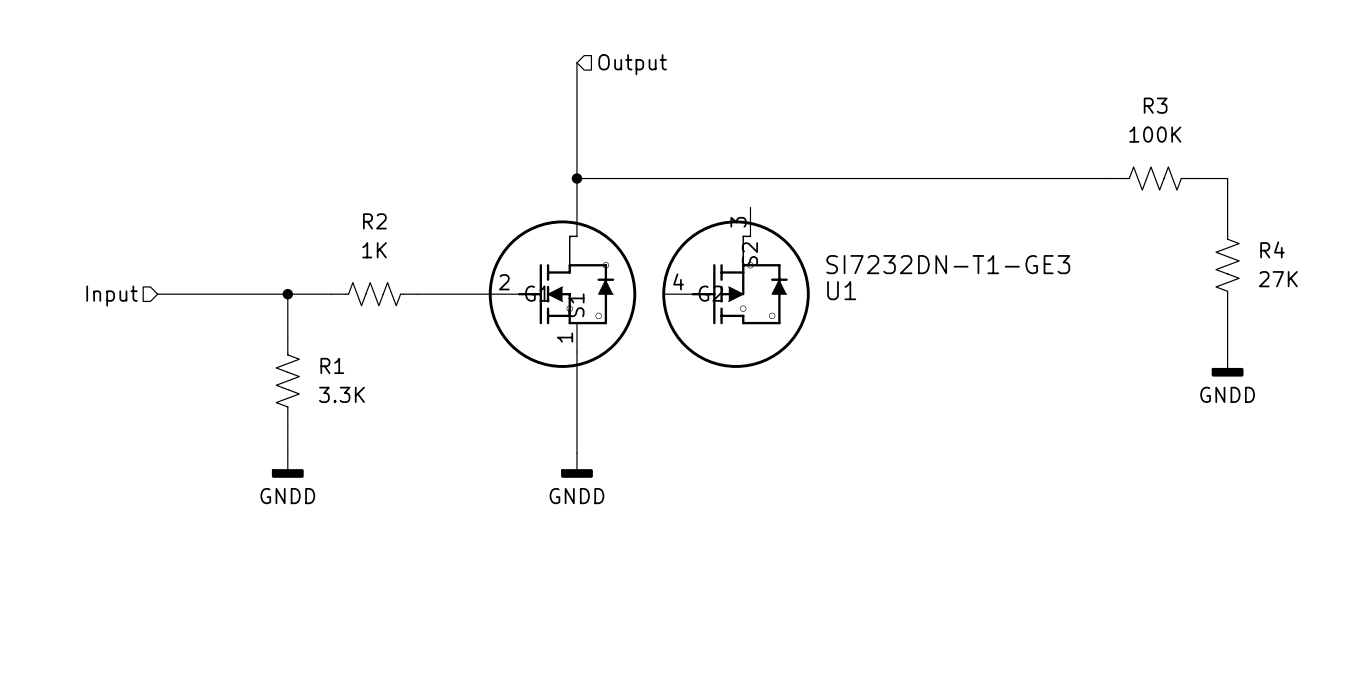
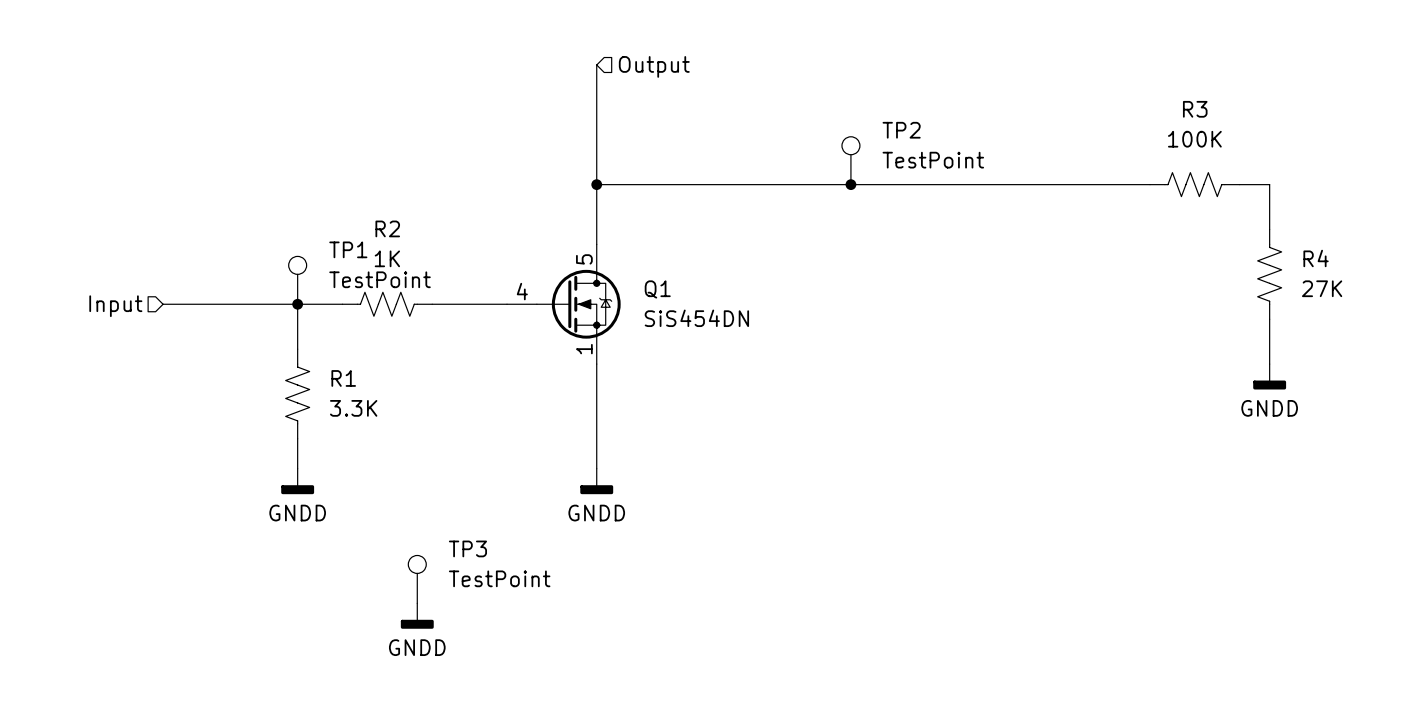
TP2: none -> TestPoint (850, 160)
junction: none -> (850, 184)
TP1: none -> TestPoint (297, 280)
U1: SI7232DN-T1-GE3 (649, 287) -> none
Q1: none -> SiS454DN (563, 304)
TP3: none -> TestPoint (417, 579)
power symbol: none -> GNDD (417, 616)

